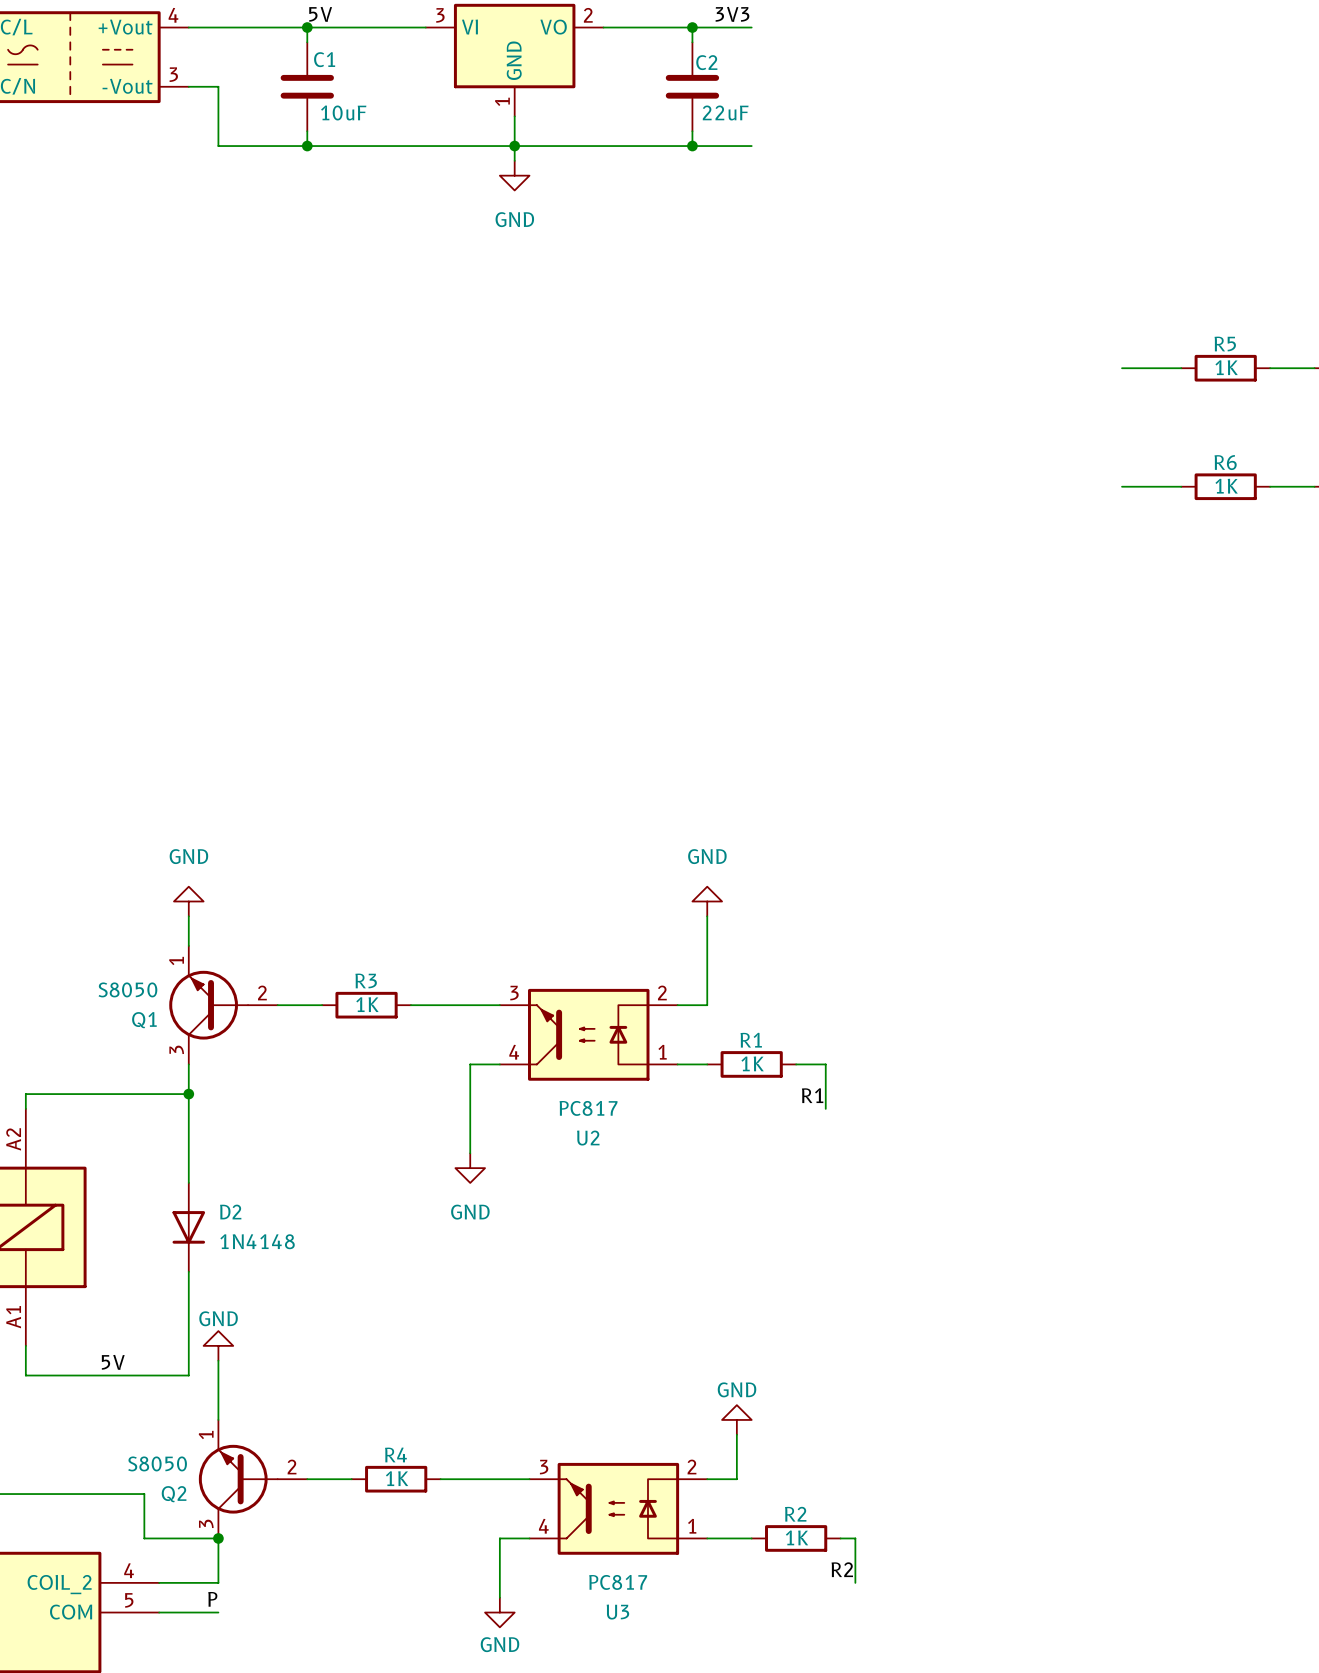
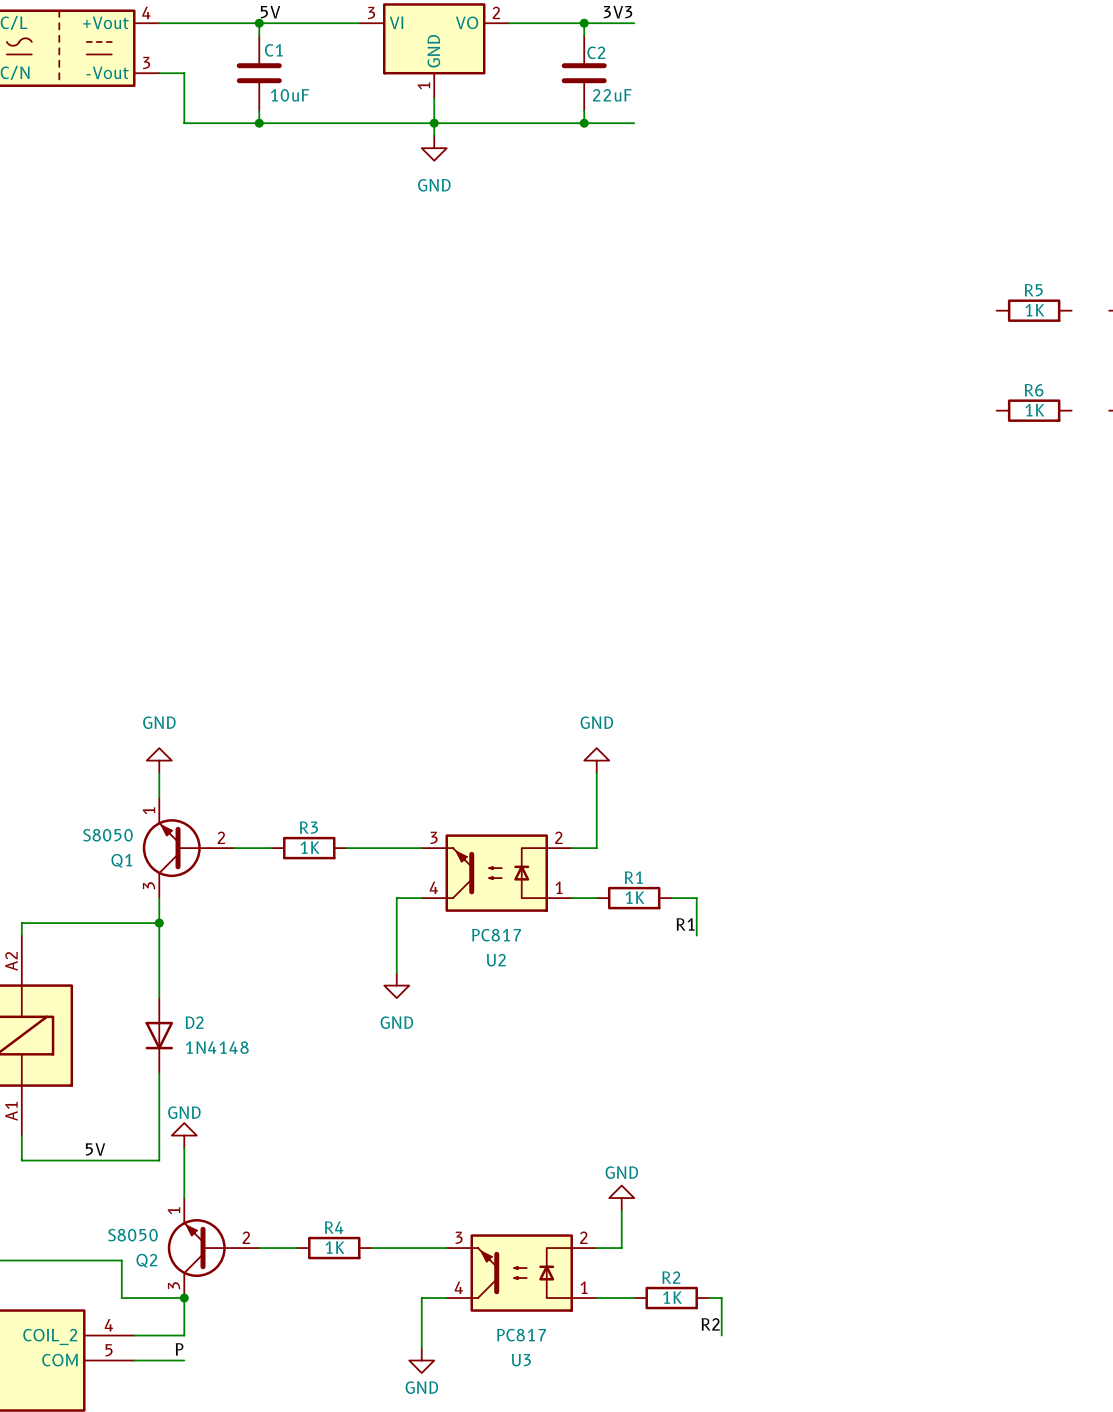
wire: (1122, 368) (1181, 368) -> none
wire: (1270, 368) (1314, 368) -> none
wire: (1122, 486) (1181, 486) -> none
wire: (1270, 486) (1314, 486) -> none

